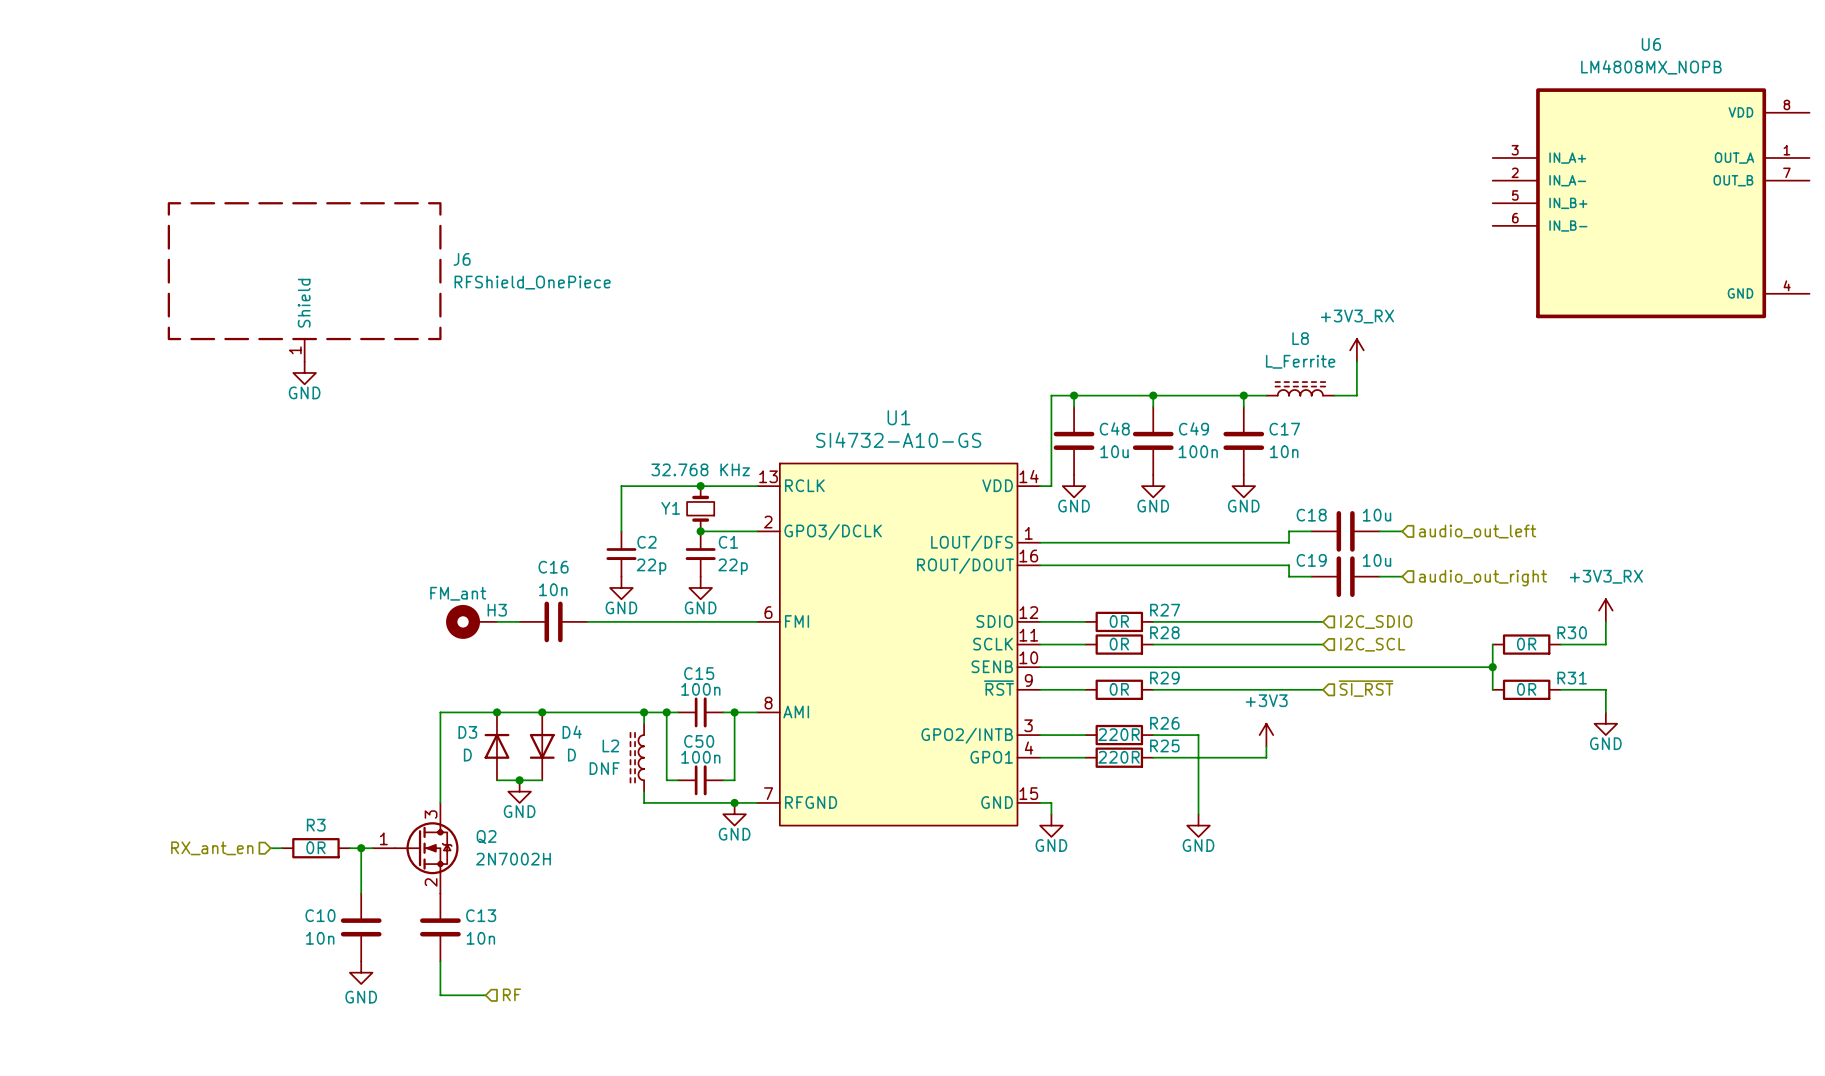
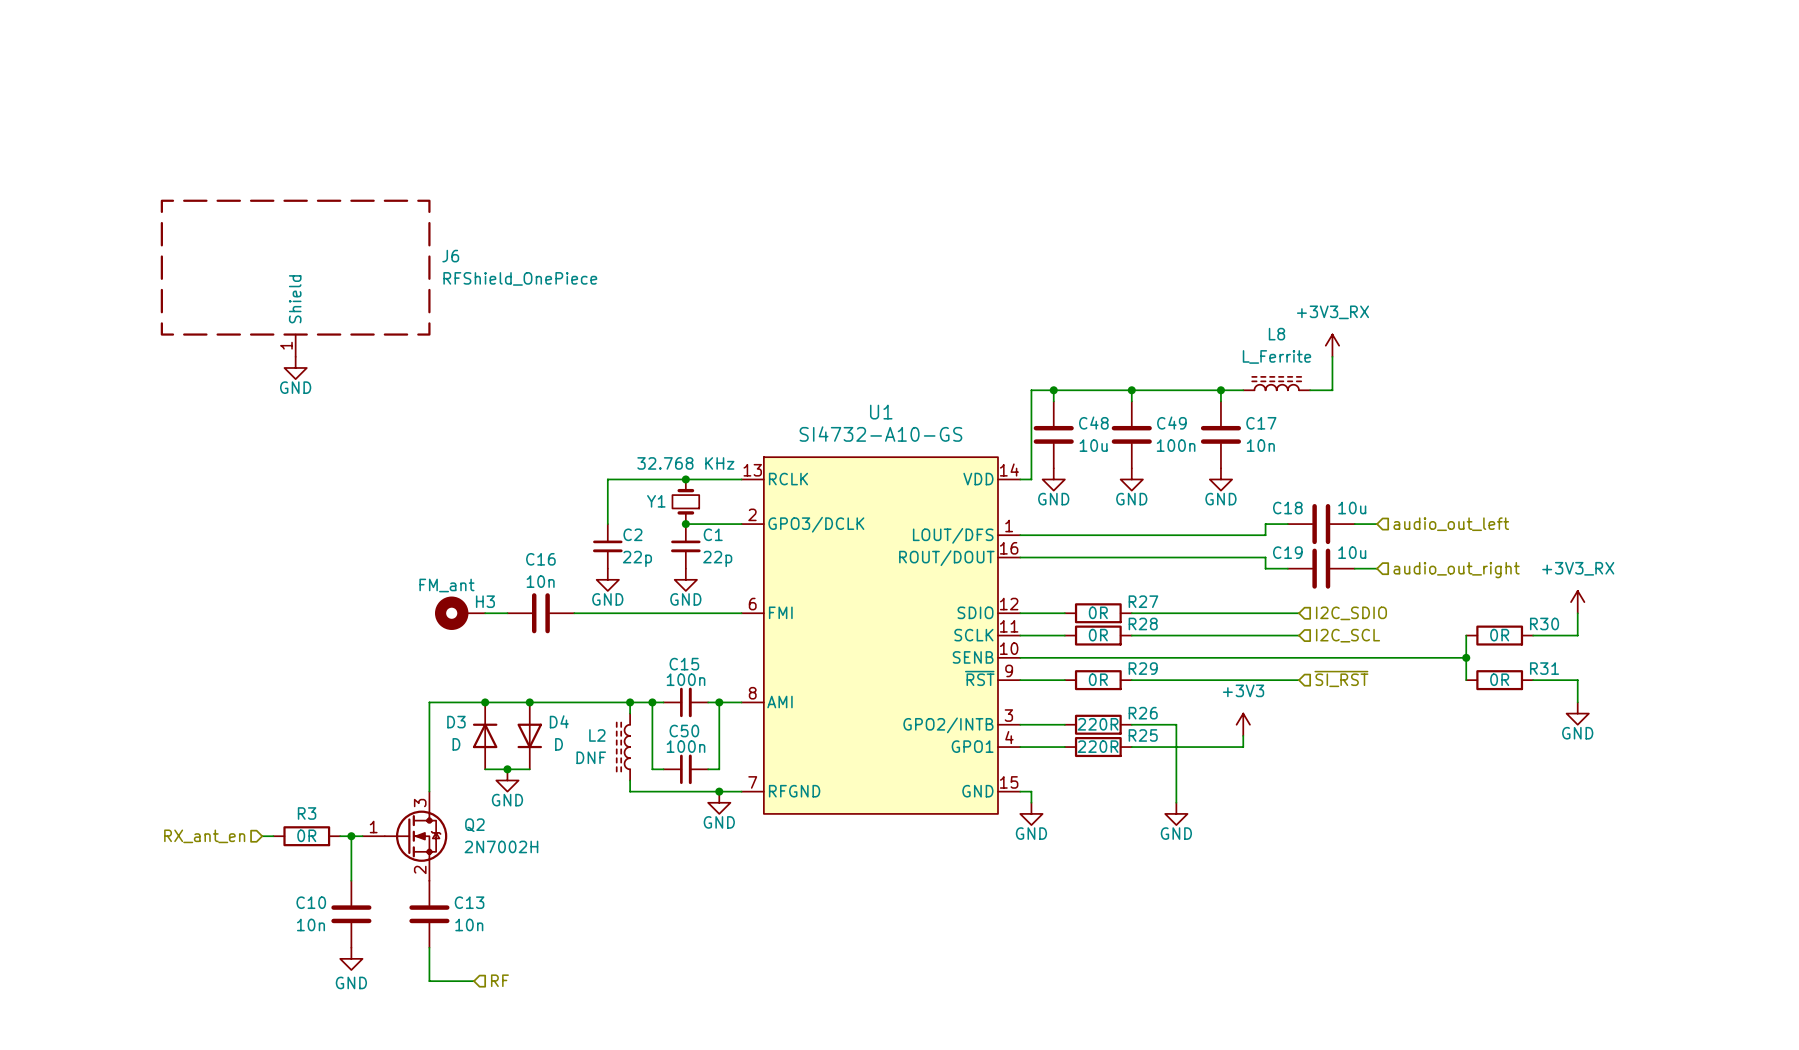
U6: LM4808MX_NOPB (1651, 203) -> none

